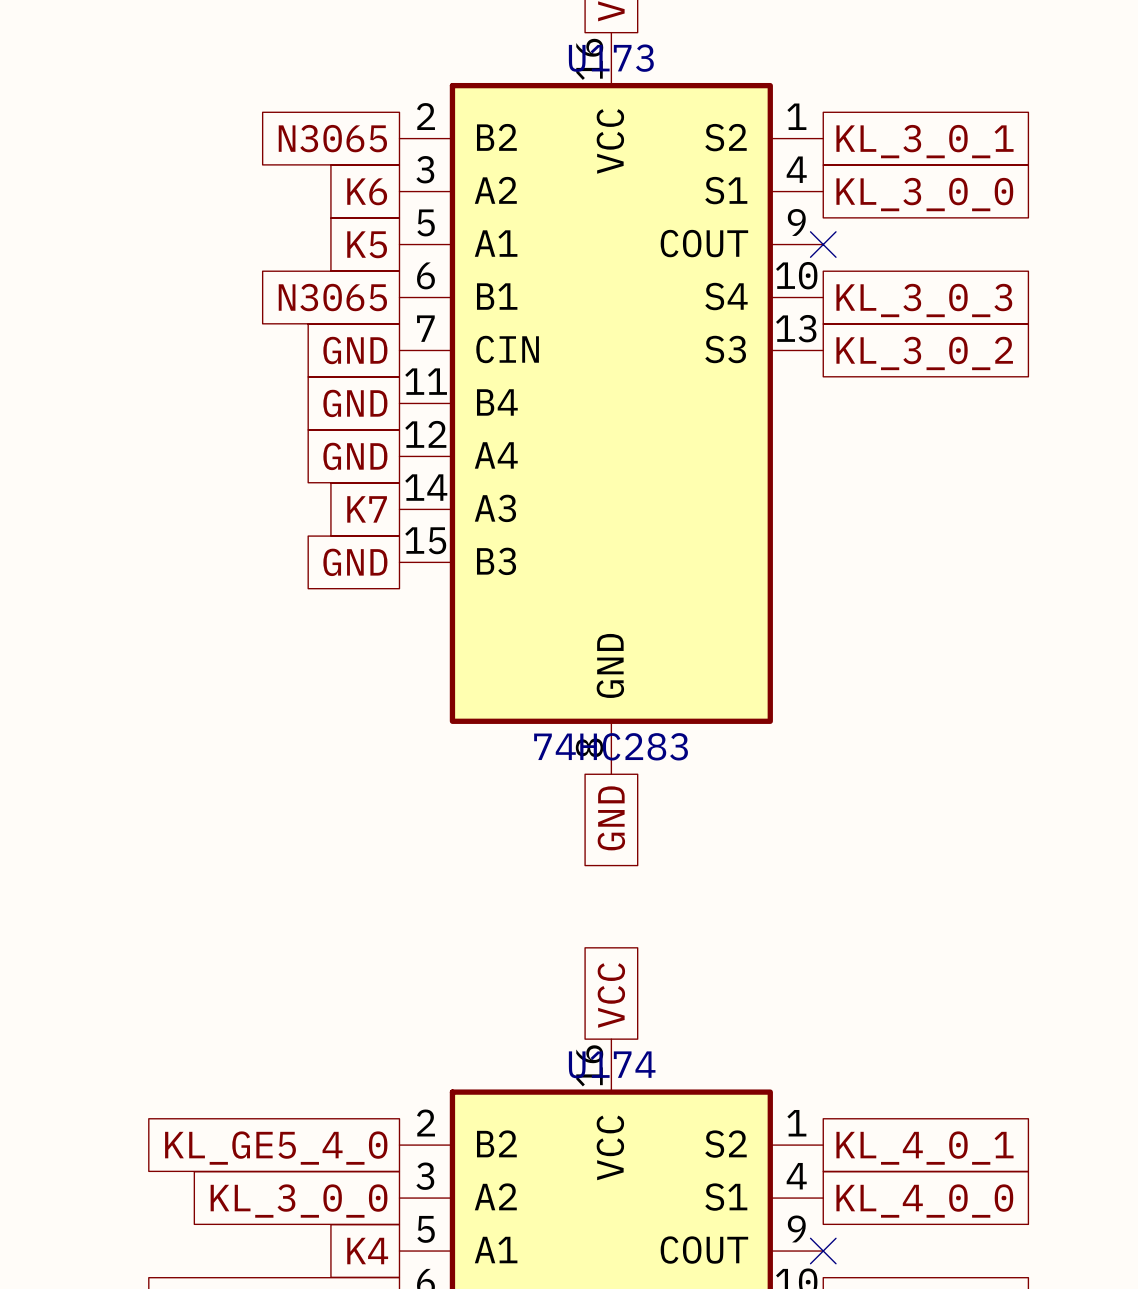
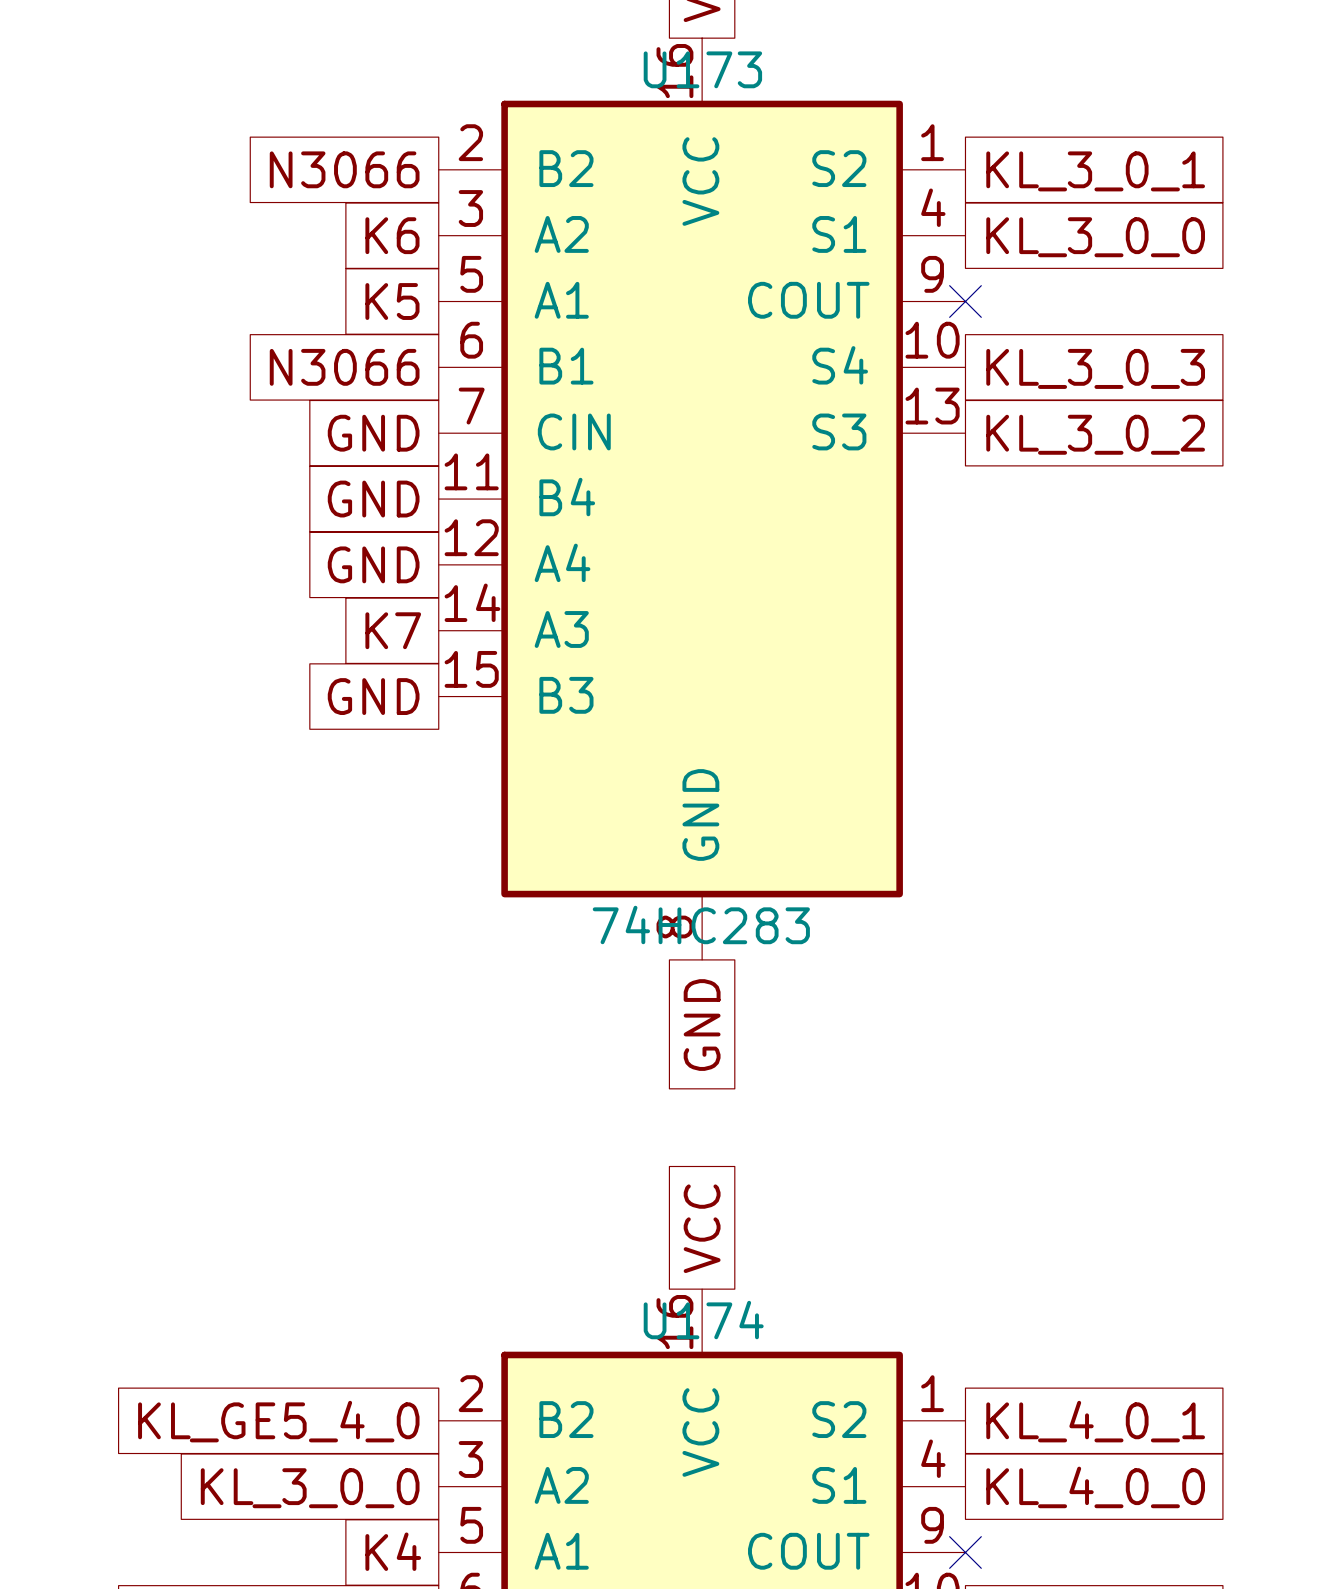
global label: N3065 (332, 138) -> N3066 (344, 169)
global label: N3065 (332, 297) -> N3066 (344, 367)

